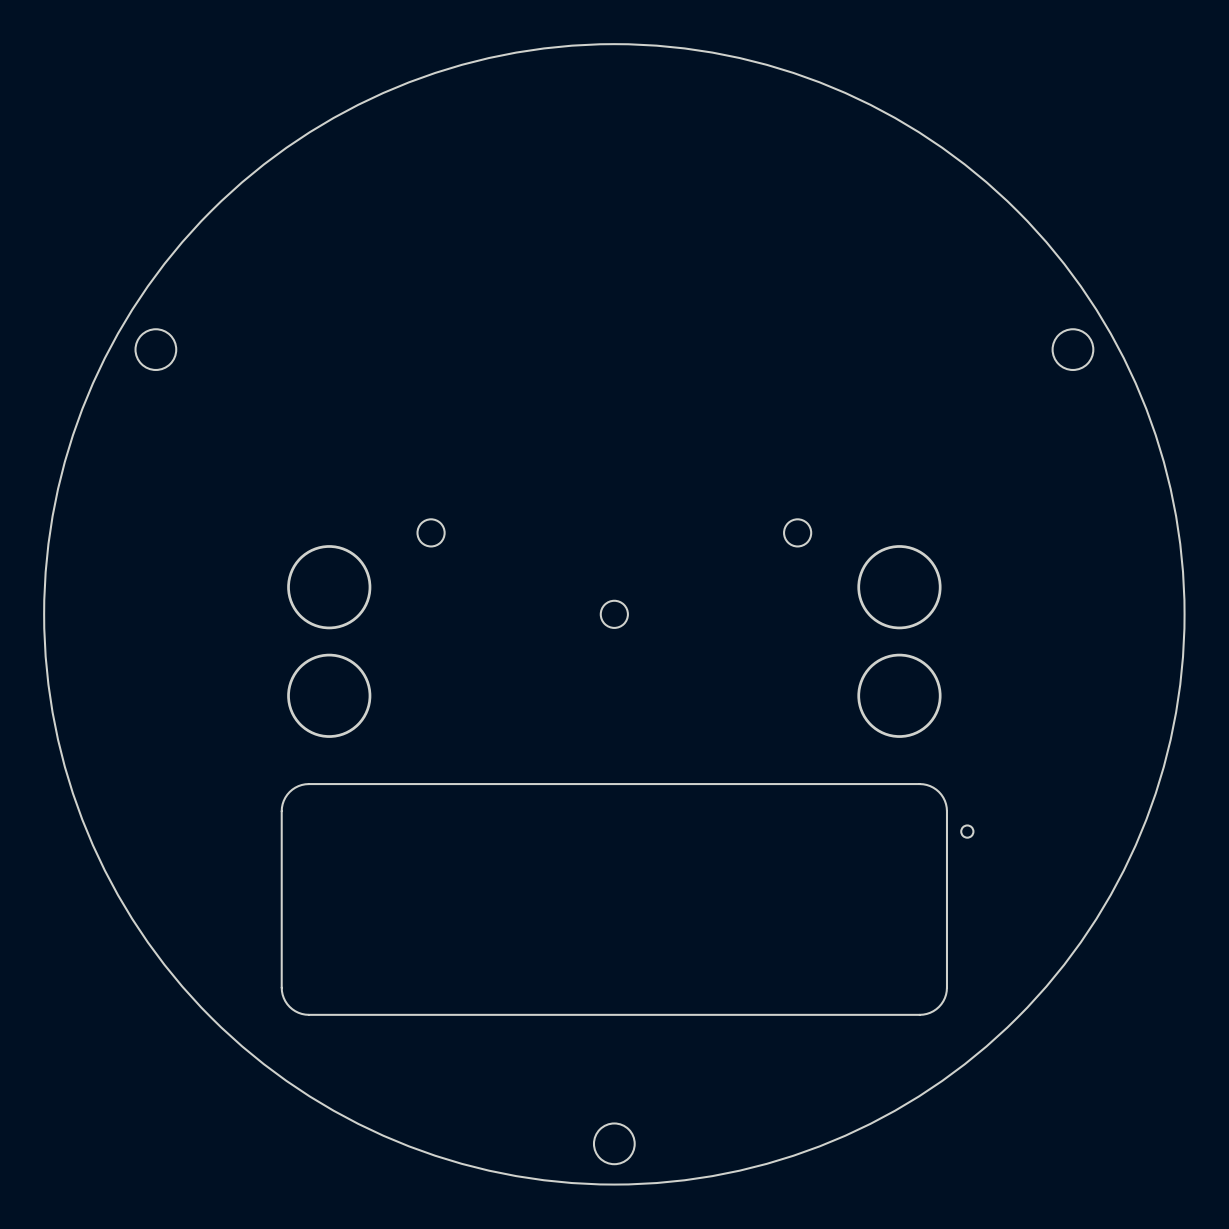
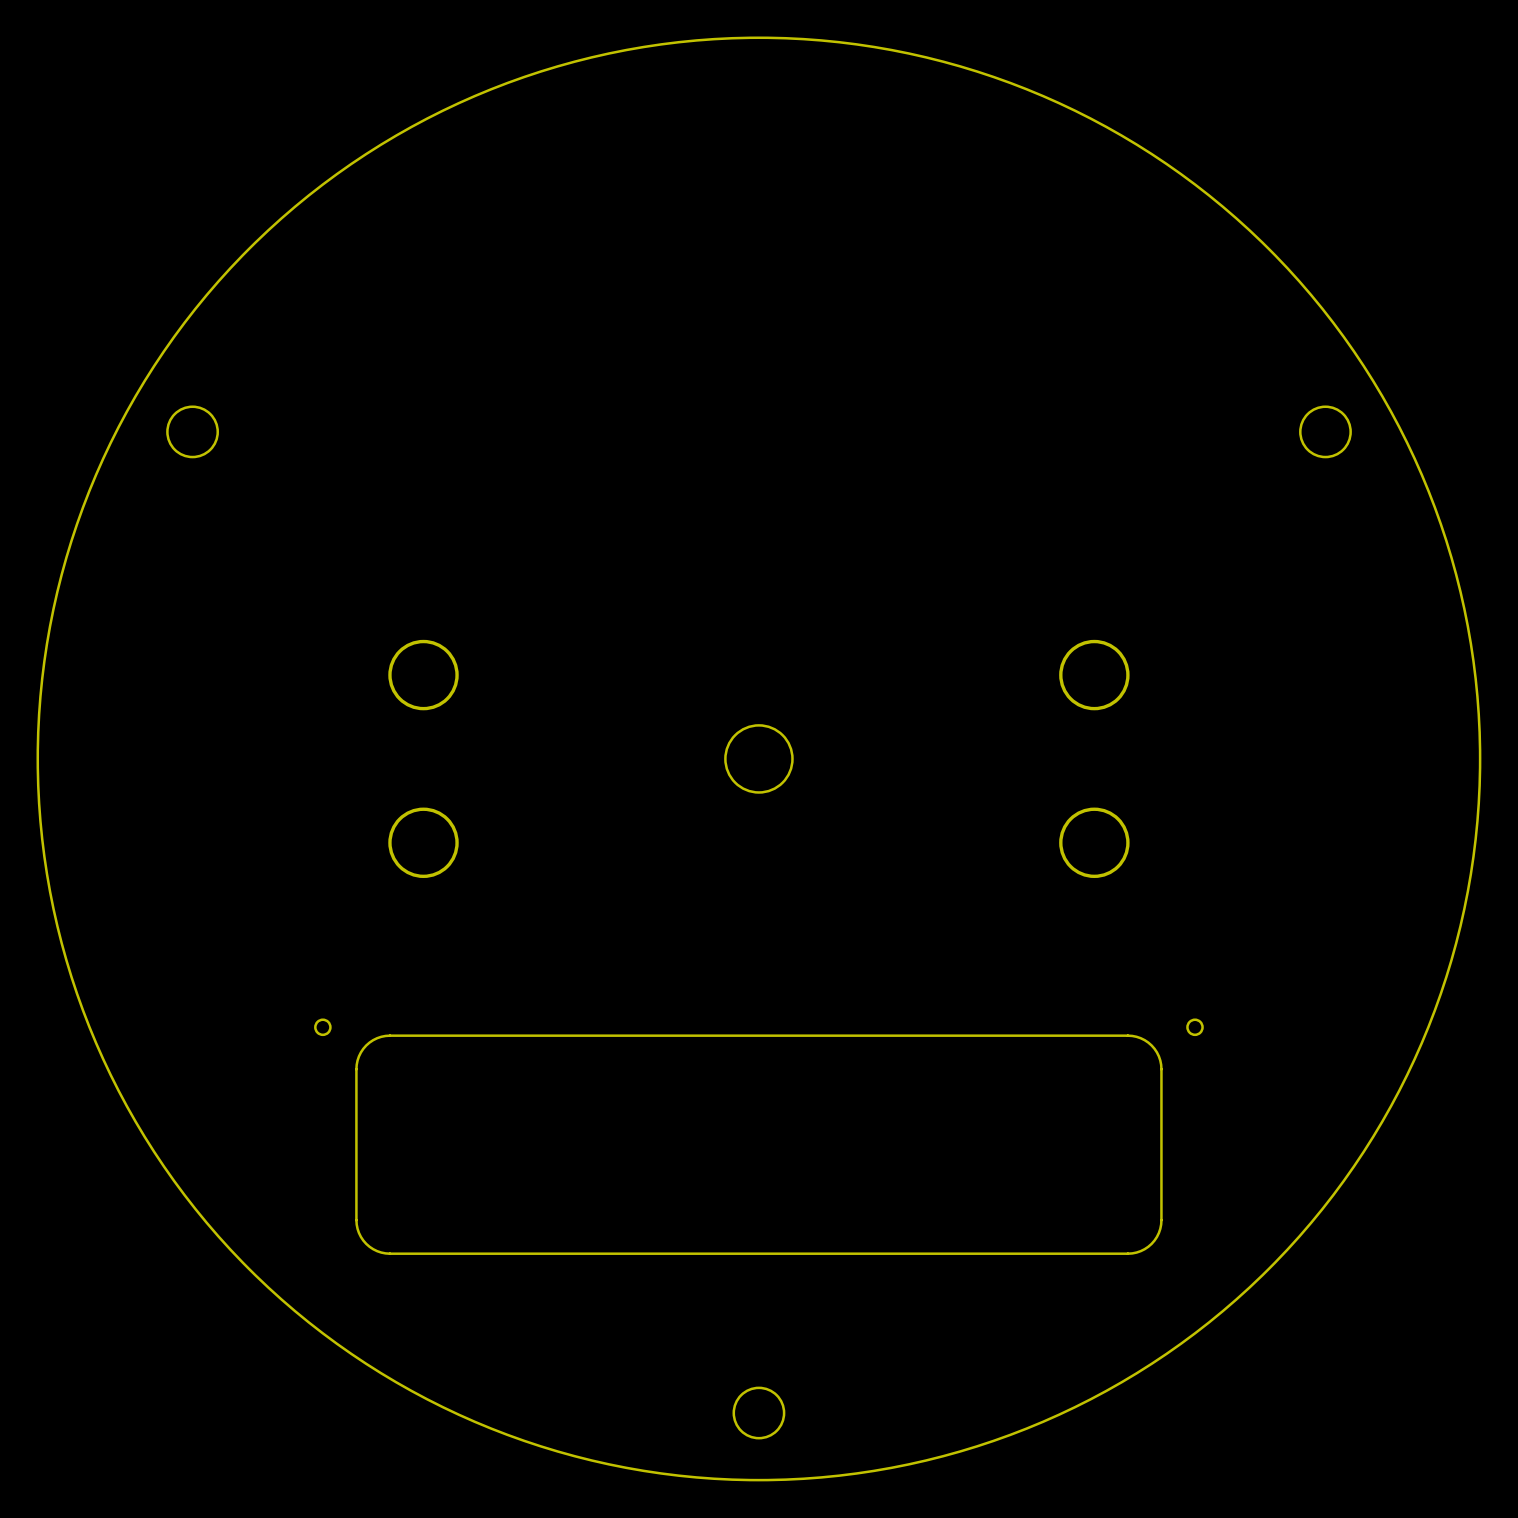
round board edge: none -> [36, 36, 1482, 1482]
round board edge: [43, 43, 1186, 1186] -> none
round board edge: none -> [388, 639, 459, 711]
round board edge: none -> [1059, 639, 1130, 711]
round board edge: [416, 518, 446, 548] -> none
round board edge: [783, 518, 813, 548] -> none
round board edge: [287, 545, 372, 630] -> none
round board edge: [857, 545, 942, 630] -> none
round board edge: none -> [724, 724, 794, 794]
round board edge: [599, 599, 629, 629] -> none
round board edge: [287, 653, 372, 738] -> none
round board edge: none -> [388, 807, 459, 879]
round board edge: [857, 653, 942, 738] -> none
round board edge: none -> [1059, 807, 1130, 879]
round board edge: none -> [314, 1018, 332, 1037]
board edge: (913, 1014) (926, 1013) (936, 1009) (943, 1001) (946, 987) (946, 807) (943, 797) (936, 789) (919, 784) (308, 784) (298, 786) (287, 794) (281, 807) (281, 991) (285, 1001) (292, 1009) (301, 1013) (315, 1014) -> (1127, 1253) (1140, 1251) (1151, 1243) (1158, 1232) (1161, 1220) (1161, 1064) (1156, 1052) (1148, 1042) (1140, 1038) (1127, 1035) (381, 1036) (366, 1045) (358, 1056) (356, 1064) (356, 1220) (358, 1232) (366, 1243) (377, 1251) (389, 1253)

